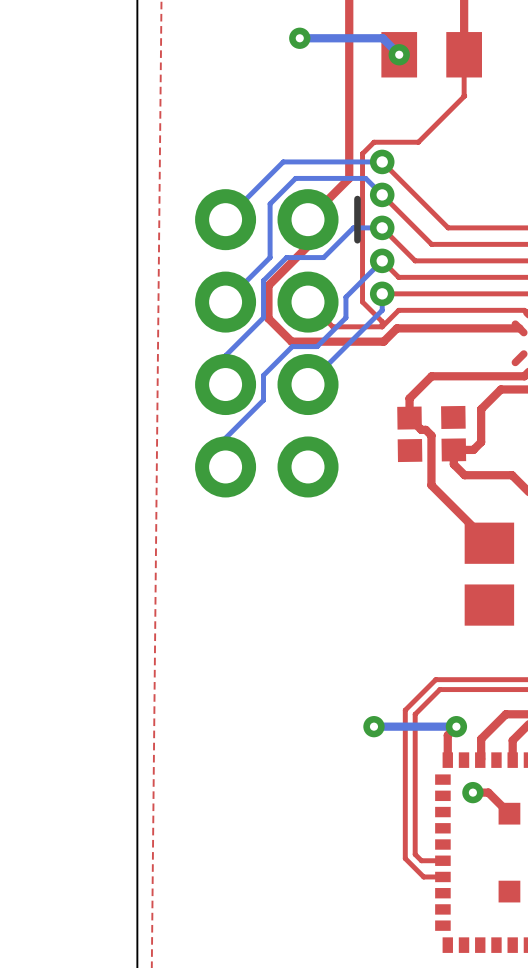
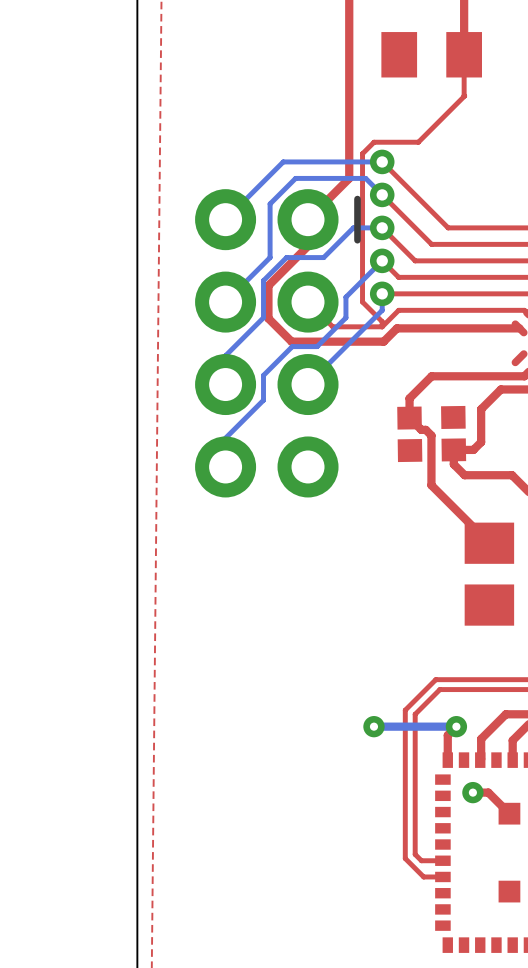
bottom track: (299, 38) (382, 38) (399, 54) -> none
via: (299, 38) -> none
via: (399, 54) -> none

